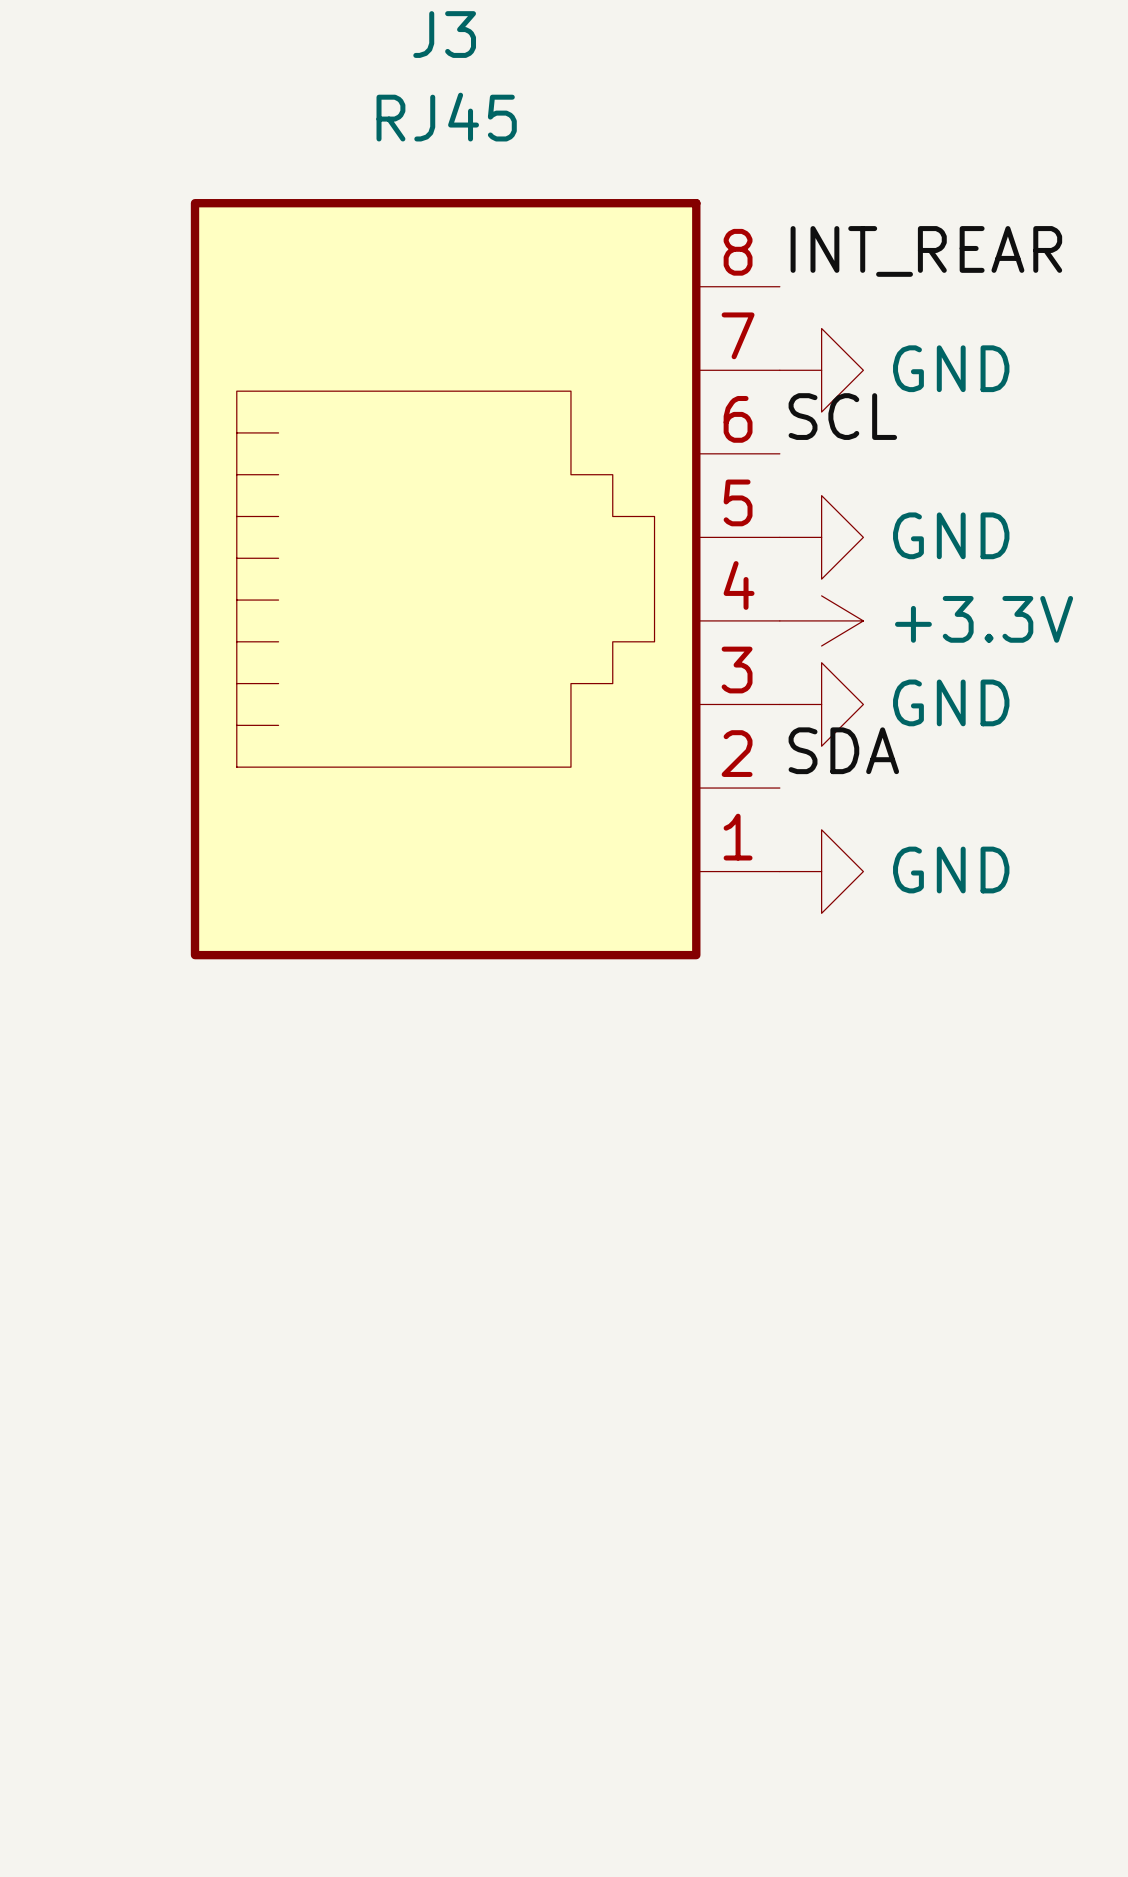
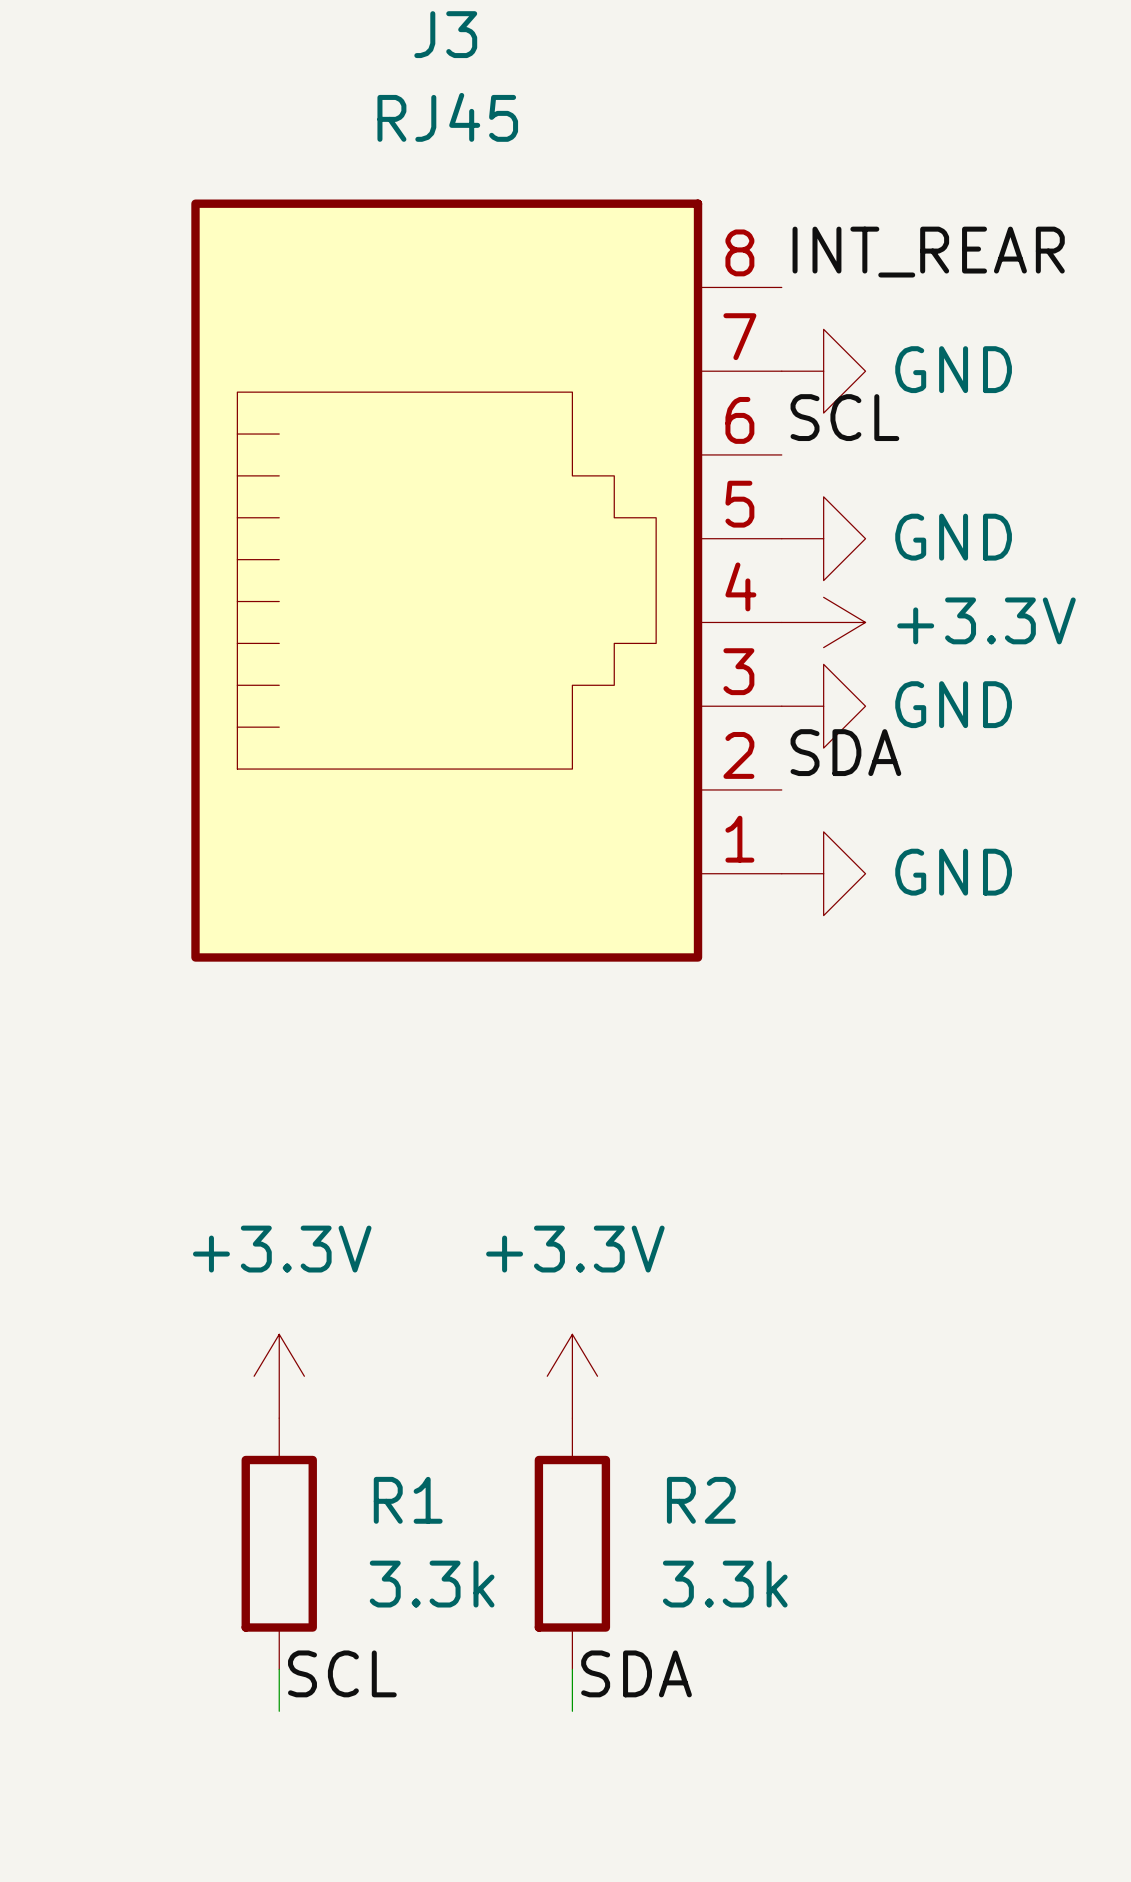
power symbol: none -> +3.3V (279, 1376)
power symbol: none -> +3.3V (572, 1376)
R1: none -> 3.3k (279, 1543)
R2: none -> 3.3k (572, 1543)
wire: none -> (279, 1669) (279, 1711)
wire: none -> (572, 1669) (572, 1711)
label: none -> SCL (342, 1673)
label: none -> SDA (636, 1673)

